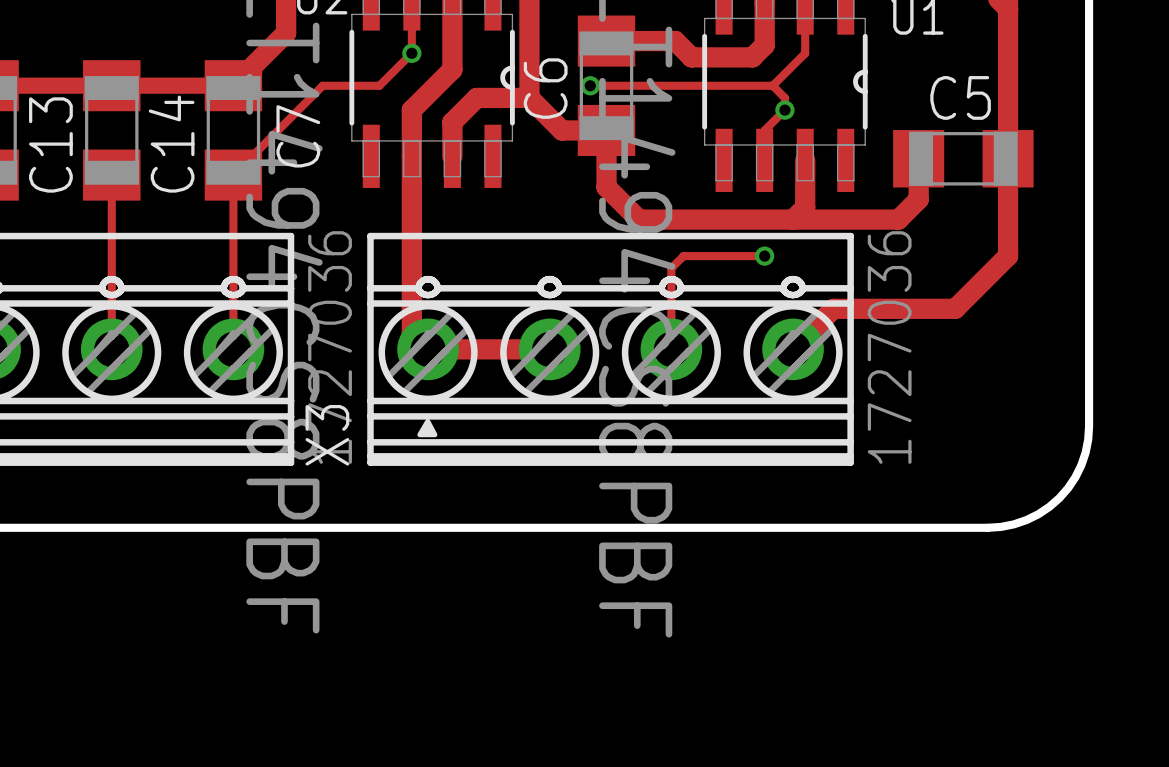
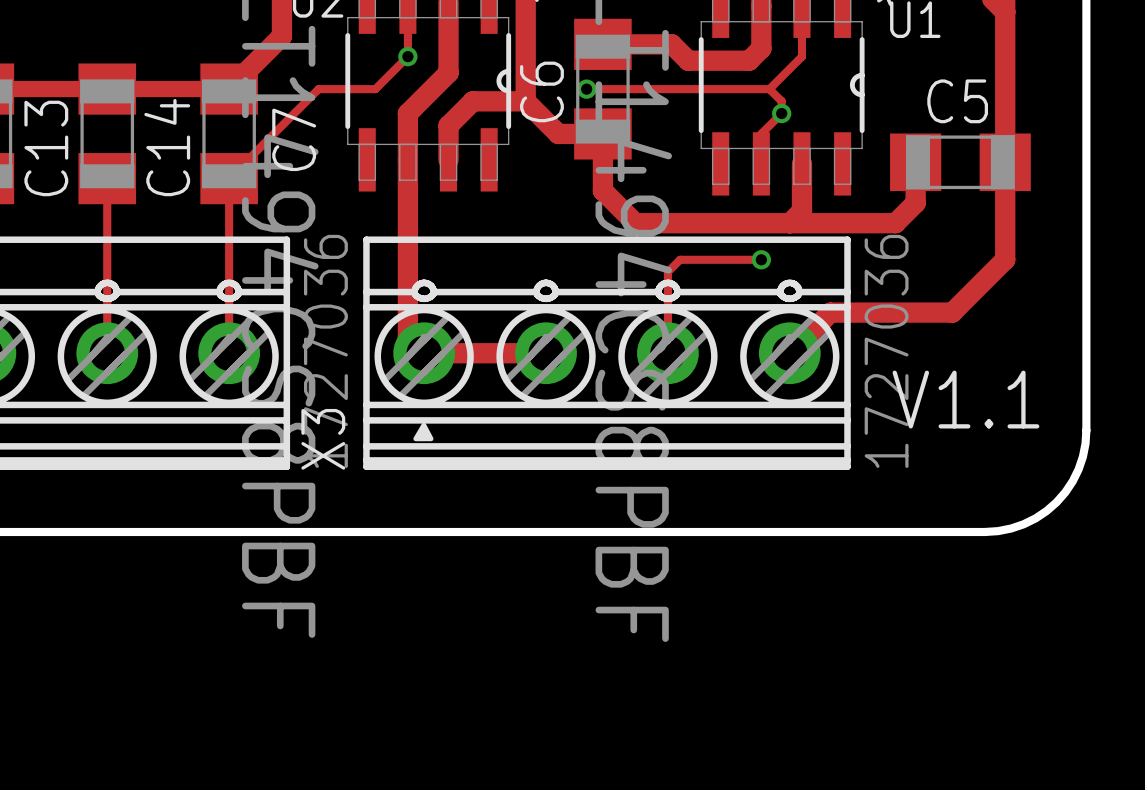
text: none -> V1.1 (965, 399)

